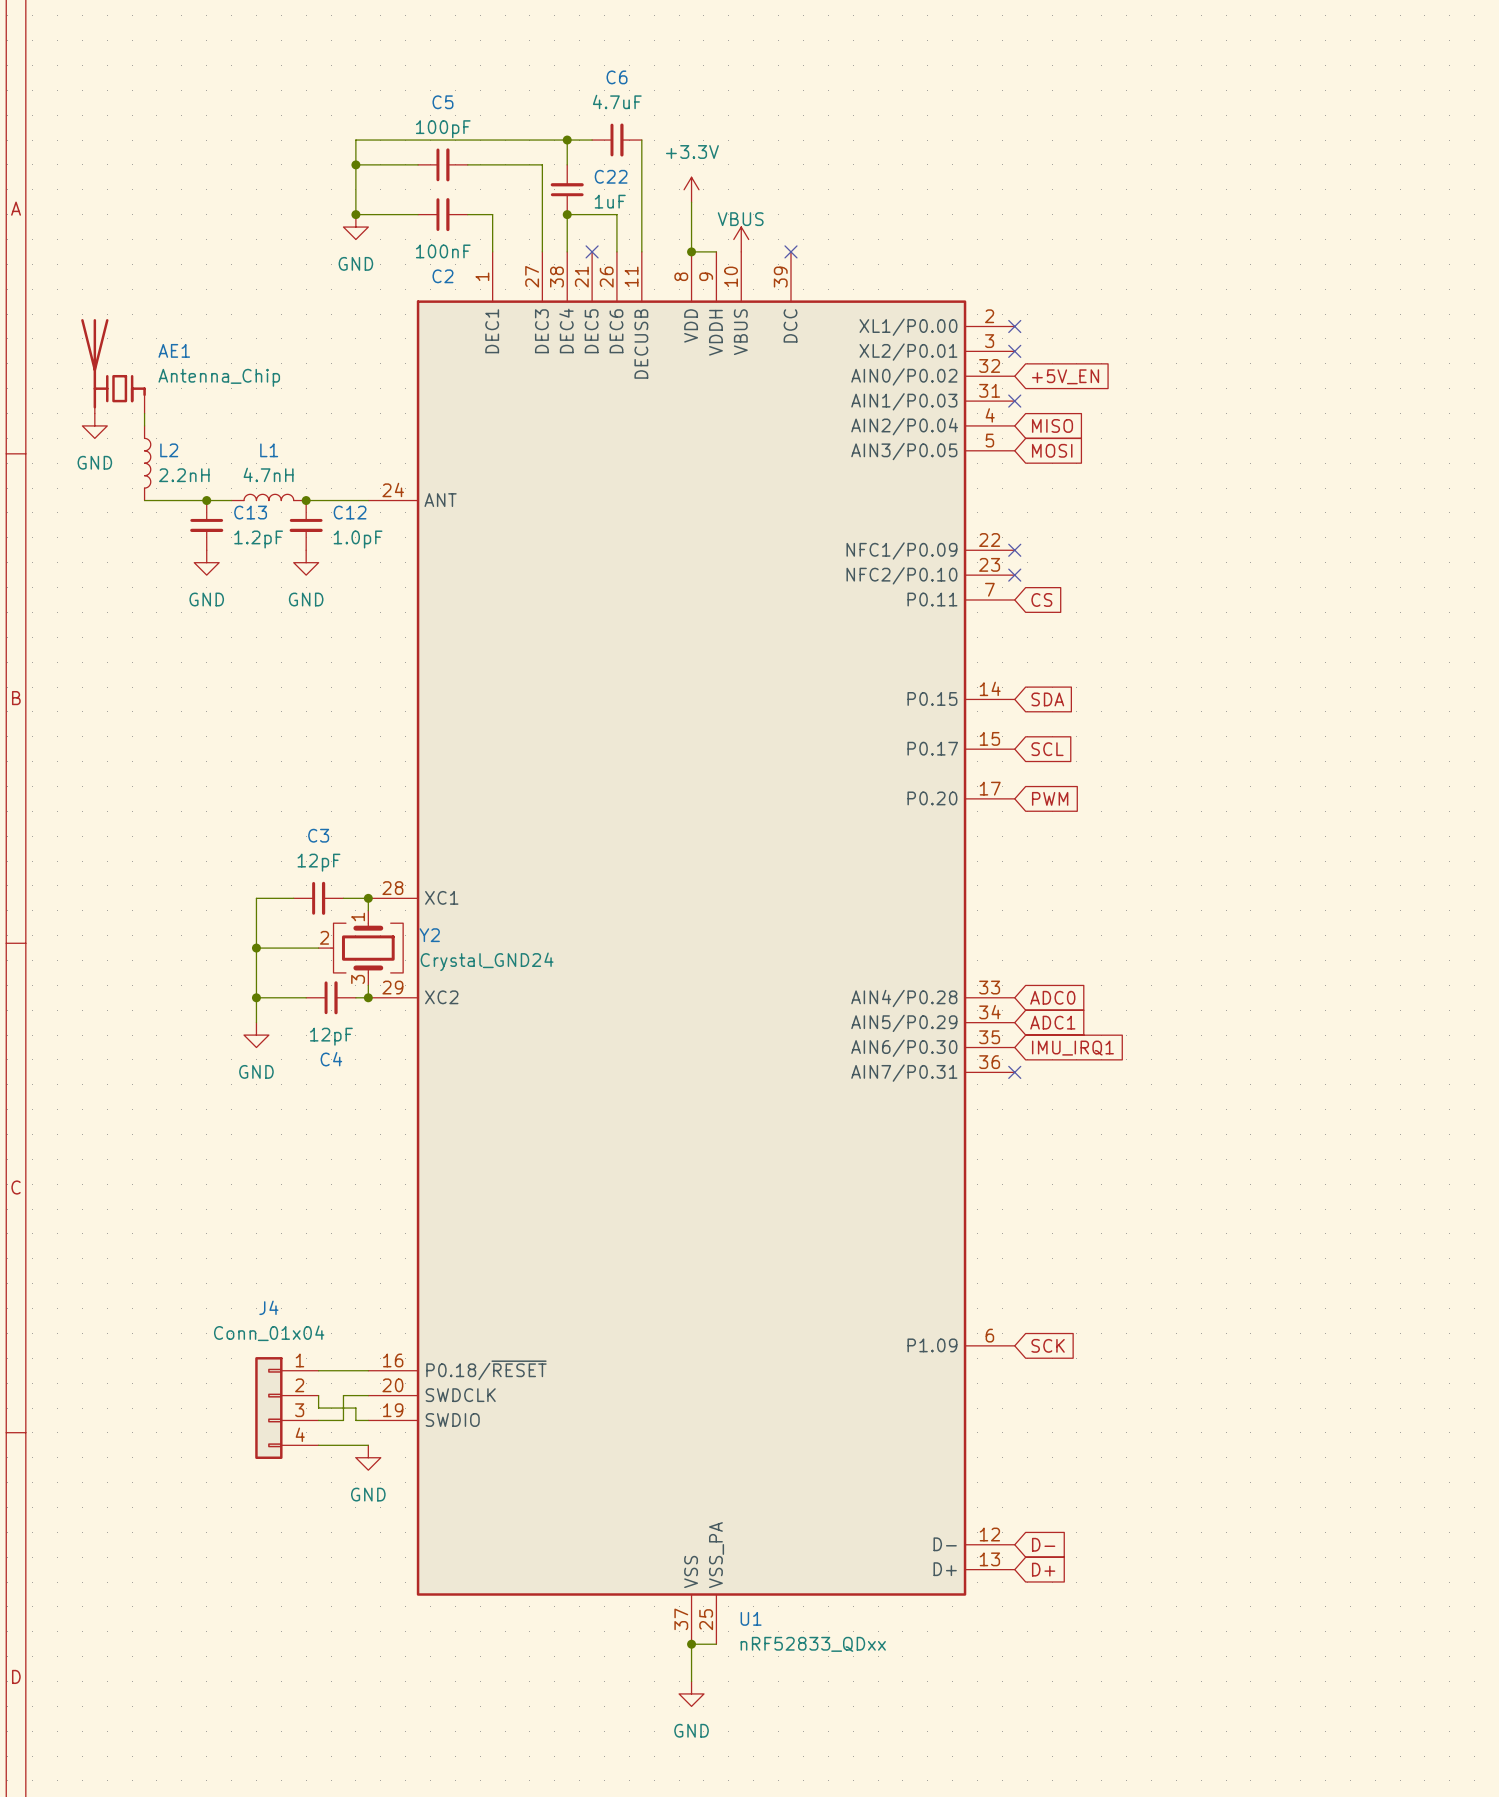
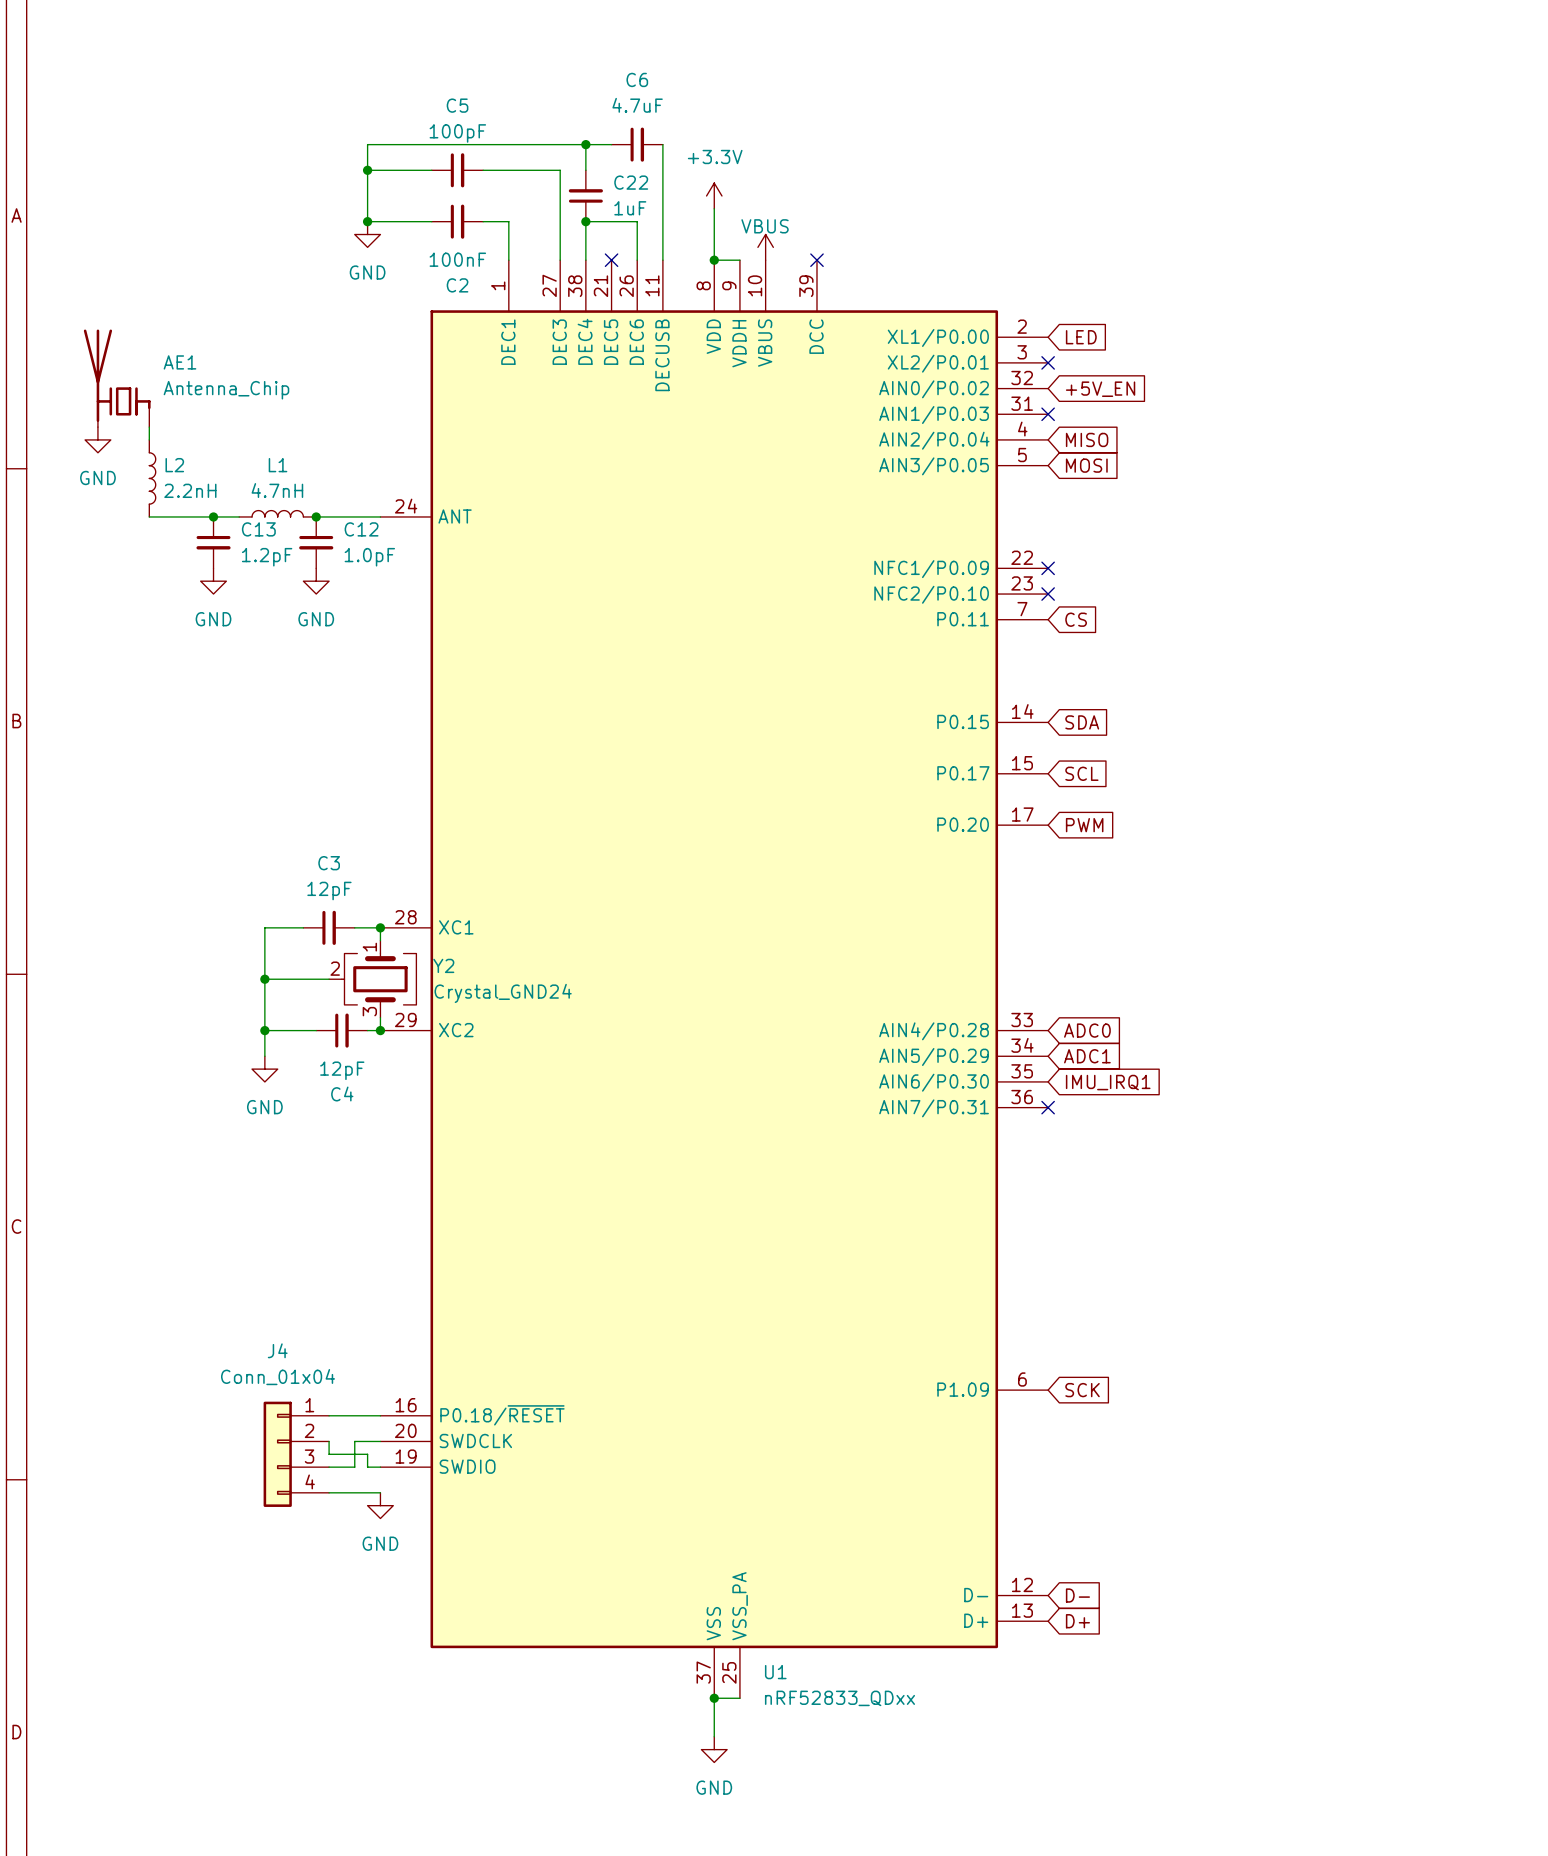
no-connect mark: (1014, 326) -> none
global label: none -> LED (1081, 337)

